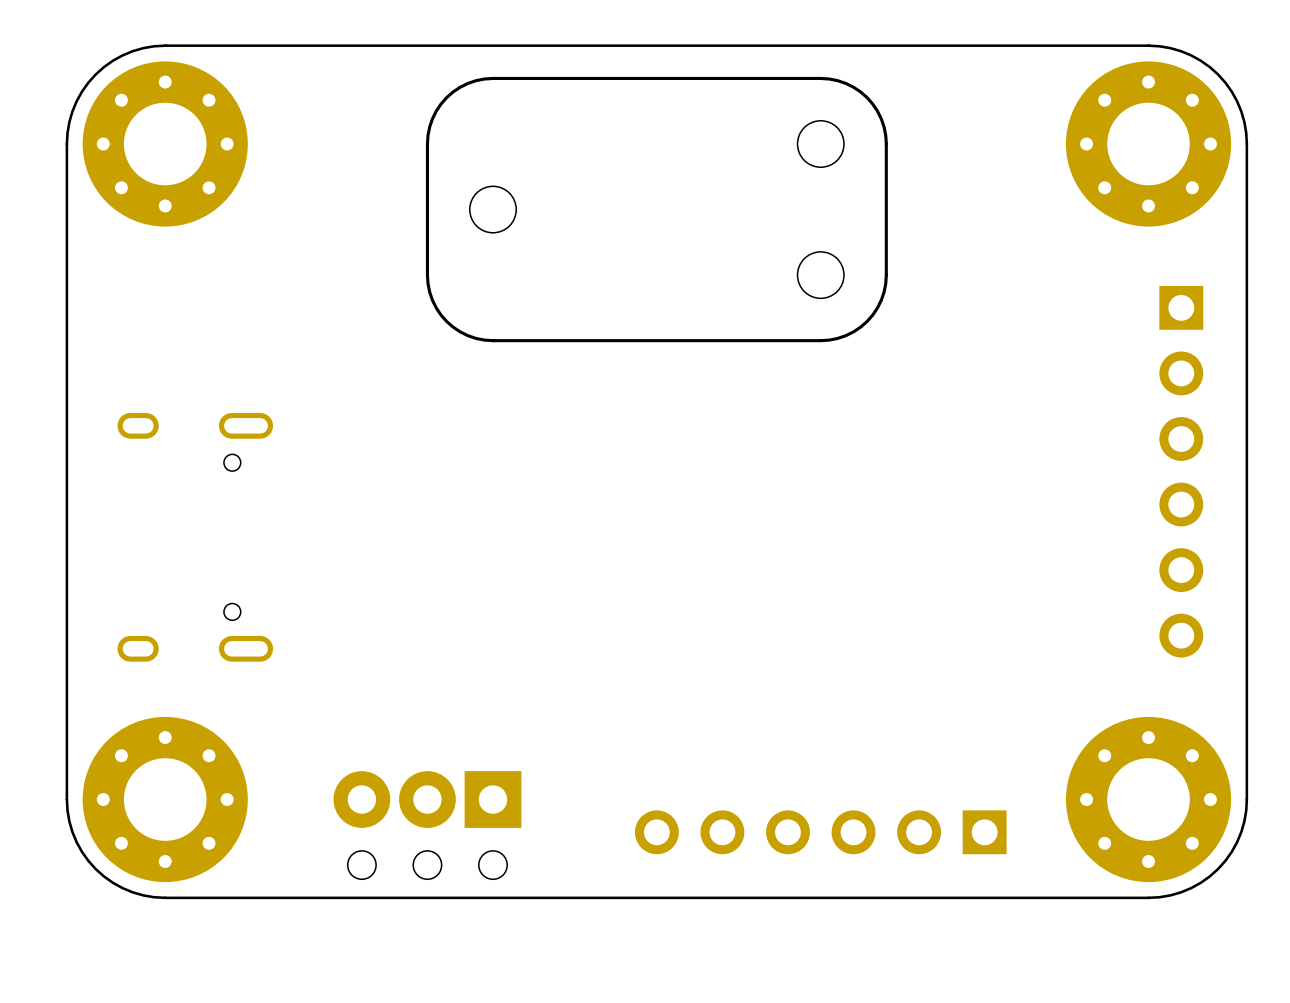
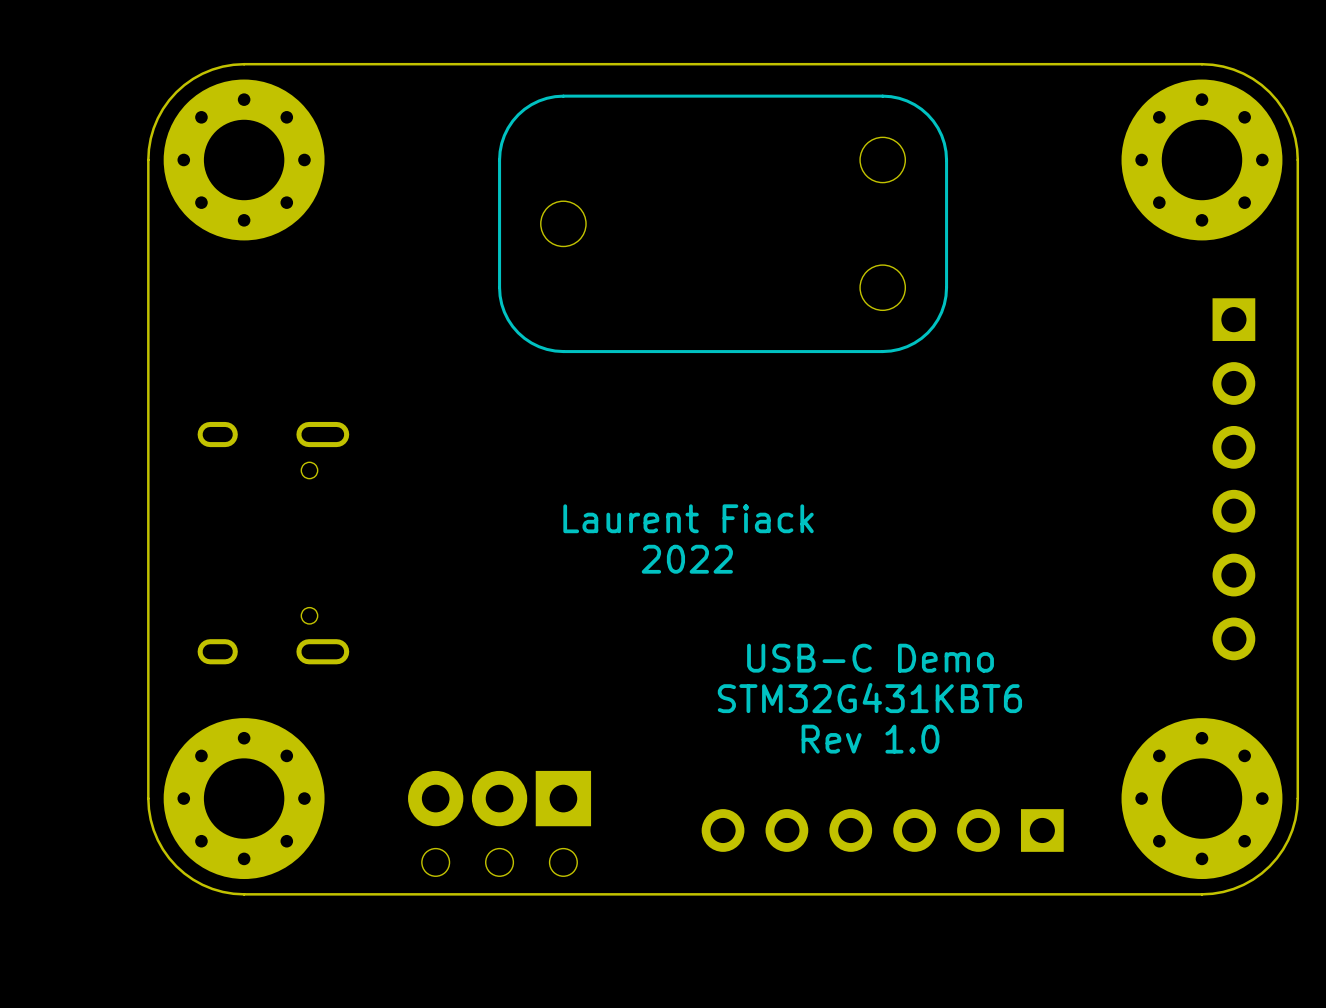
text: none -> Laurent Fiack (688, 518)
text: none -> 2022 (687, 559)
text: none -> USB-C Demo (870, 658)
text: none -> STM32G431KBT6 (869, 698)
text: none -> Rev 1.0 (870, 739)

